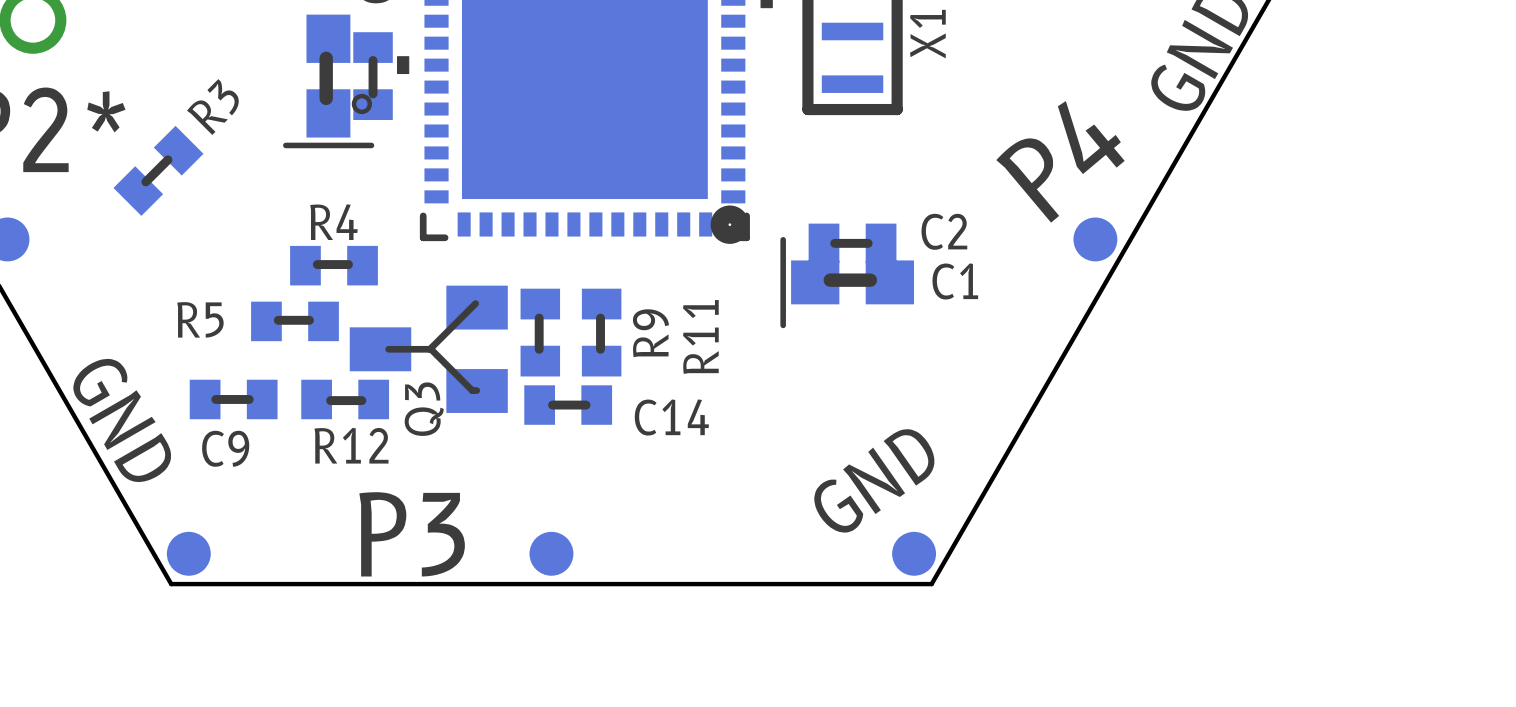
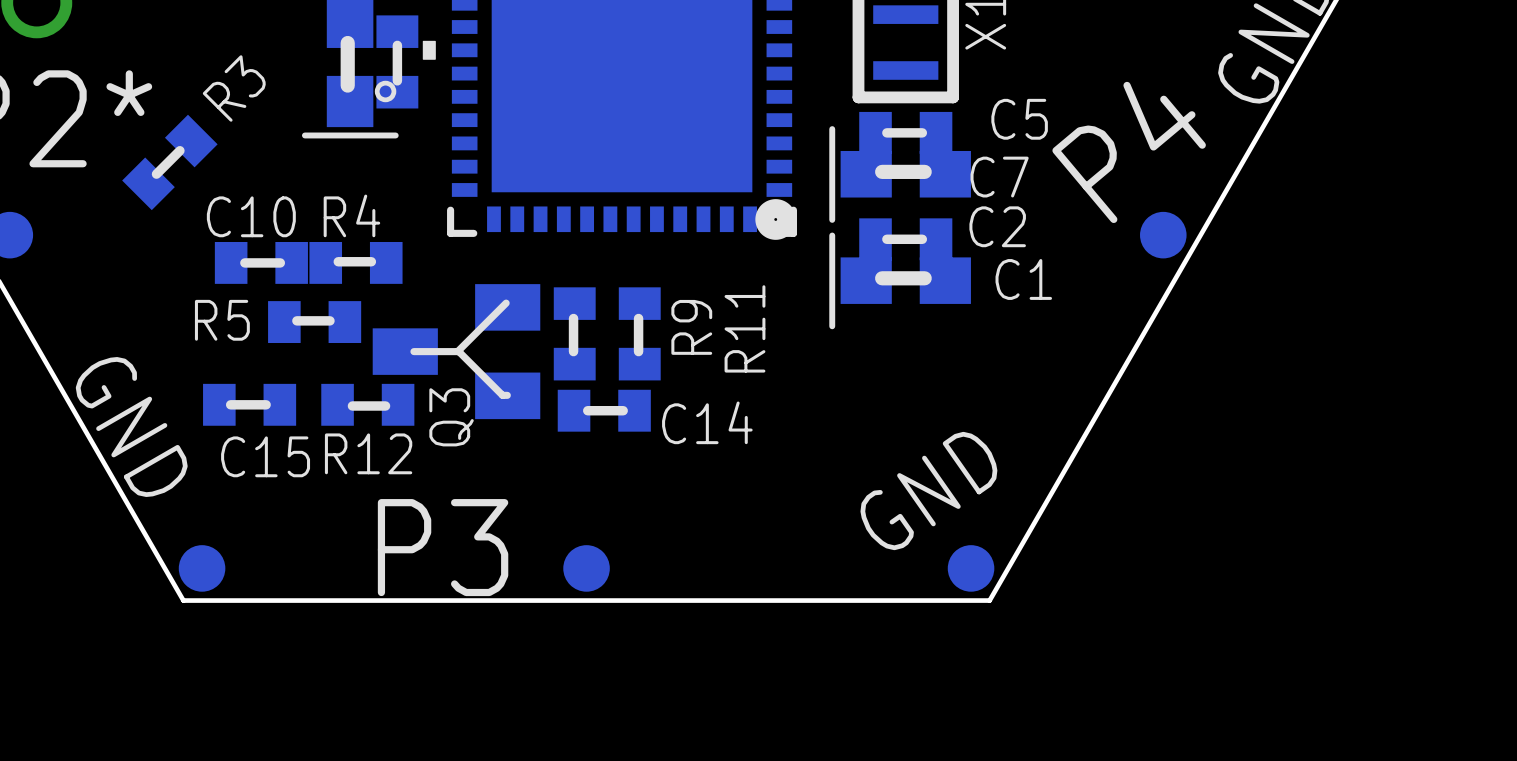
C5: none -> (905, 132)
C7: none -> (900, 174)
C10: none -> (261, 262)
C9 name: C9 (225, 448) -> C15 (265, 456)

